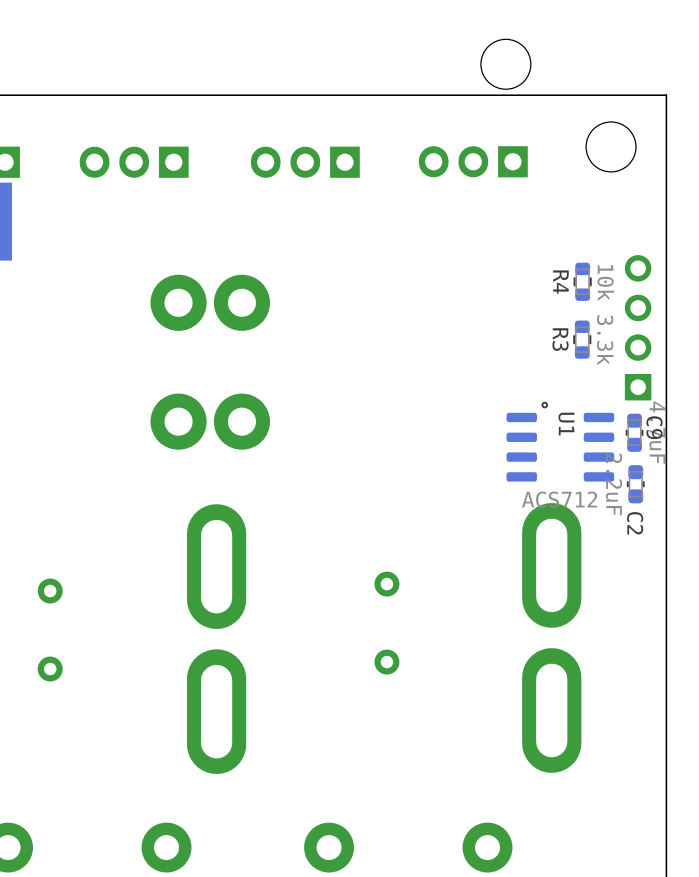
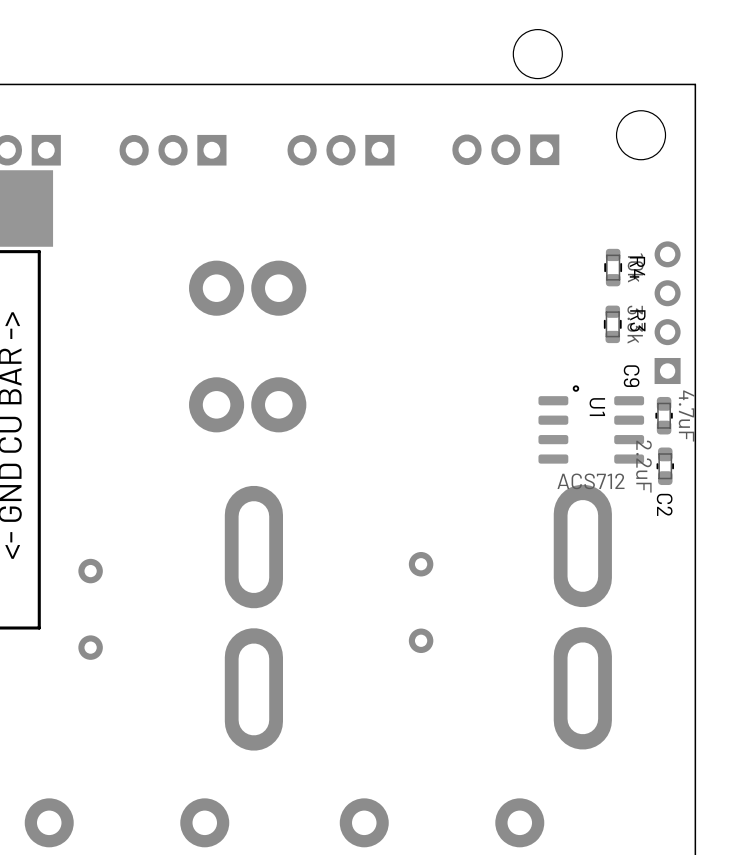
R4 name position: R4 (560, 282) -> R4 (637, 267)
R3 name position: R3 (560, 339) -> R3 (637, 320)
C9 name position: C9 (654, 427) -> C9 (631, 376)

